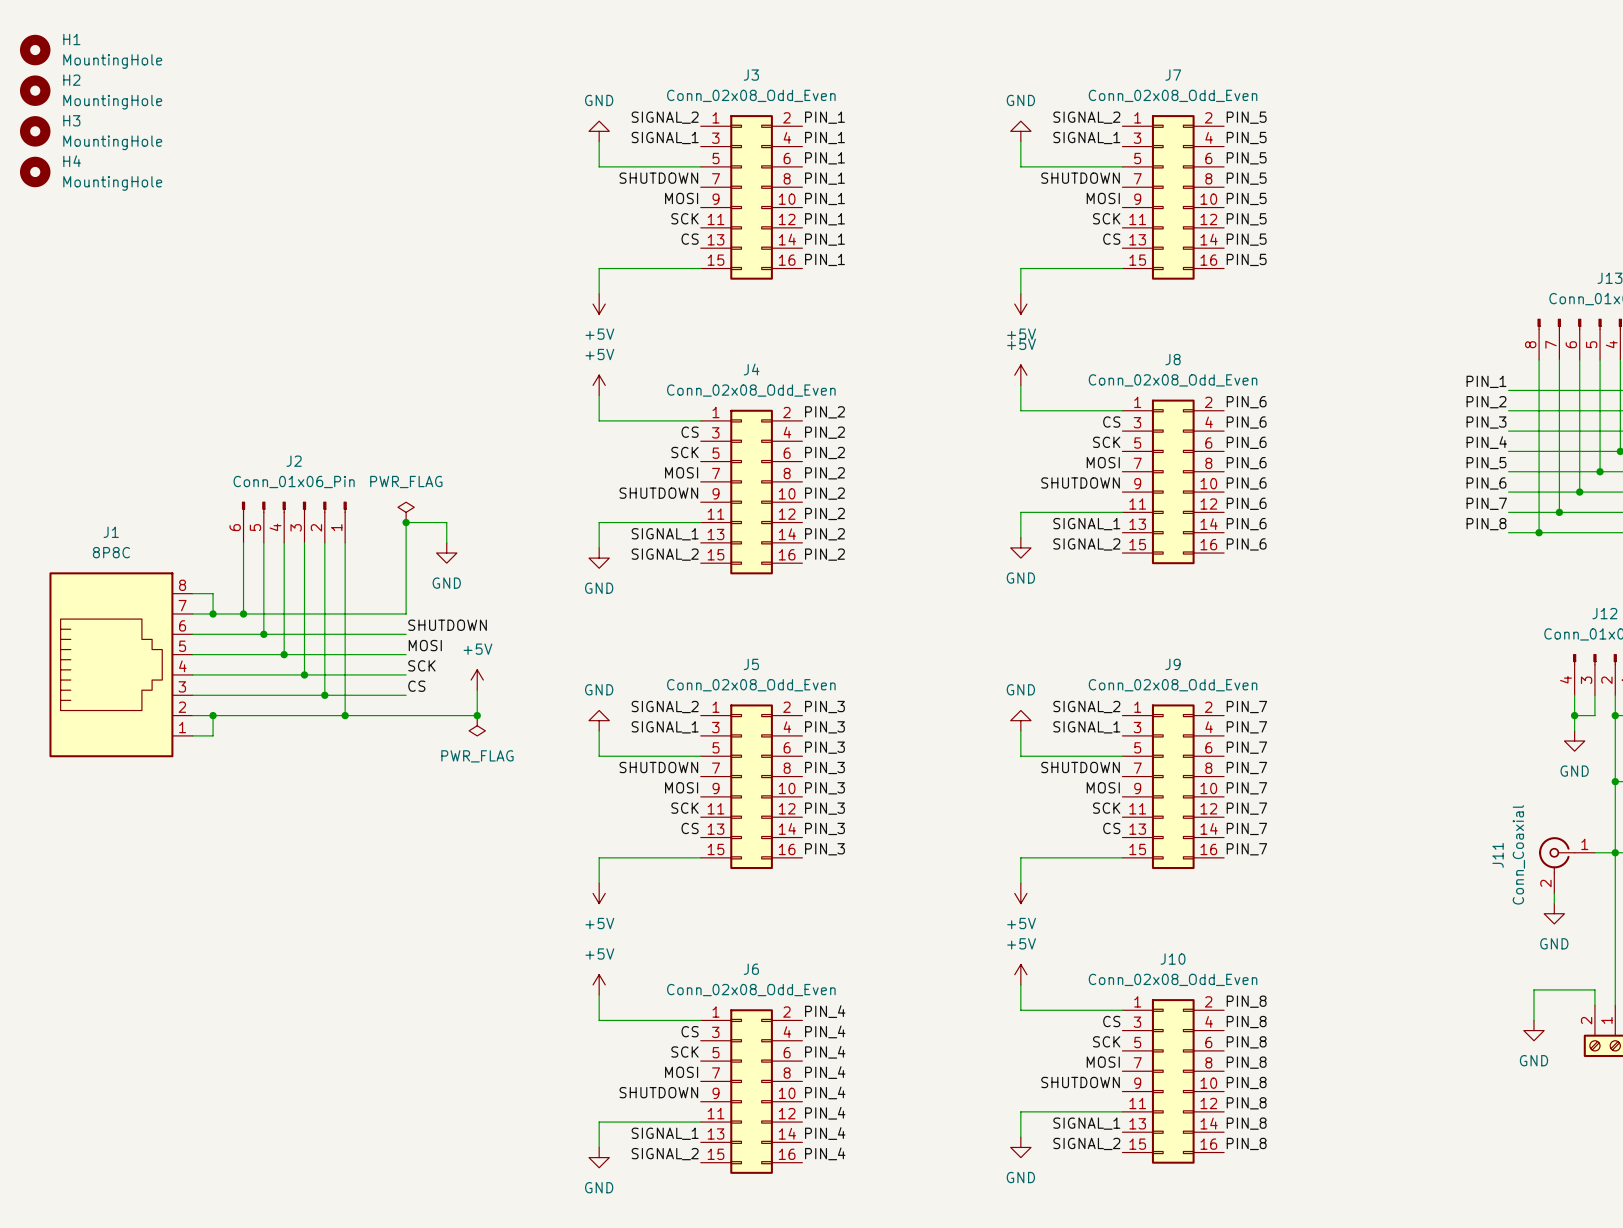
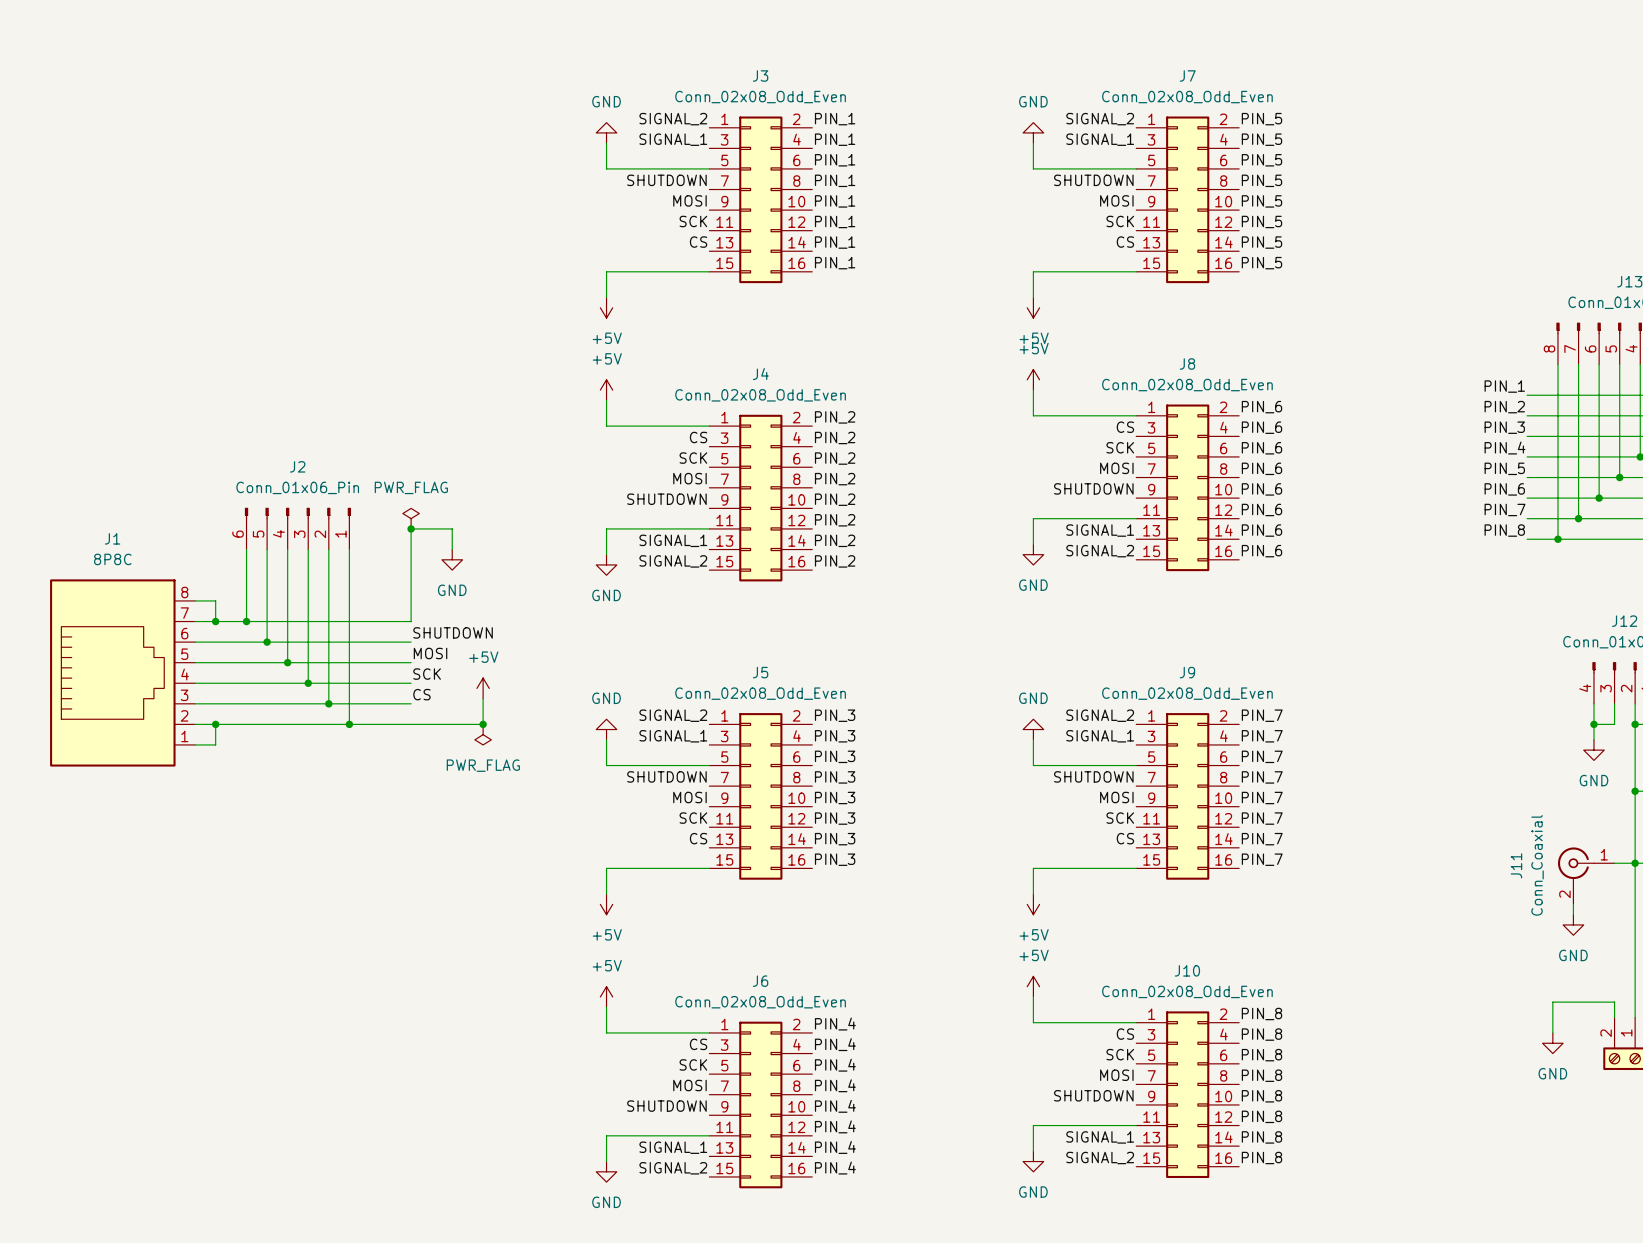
H1: MountingHole (35, 50) -> none
H2: MountingHole (35, 90) -> none
H3: MountingHole (35, 131) -> none
H4: MountingHole (35, 171) -> none

